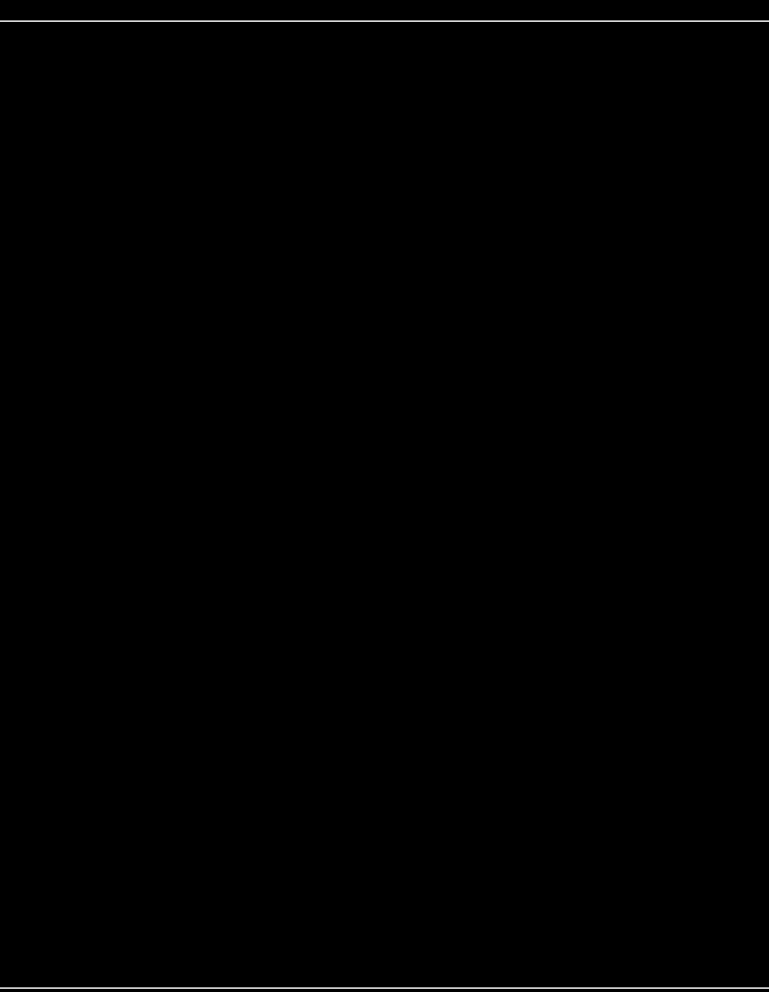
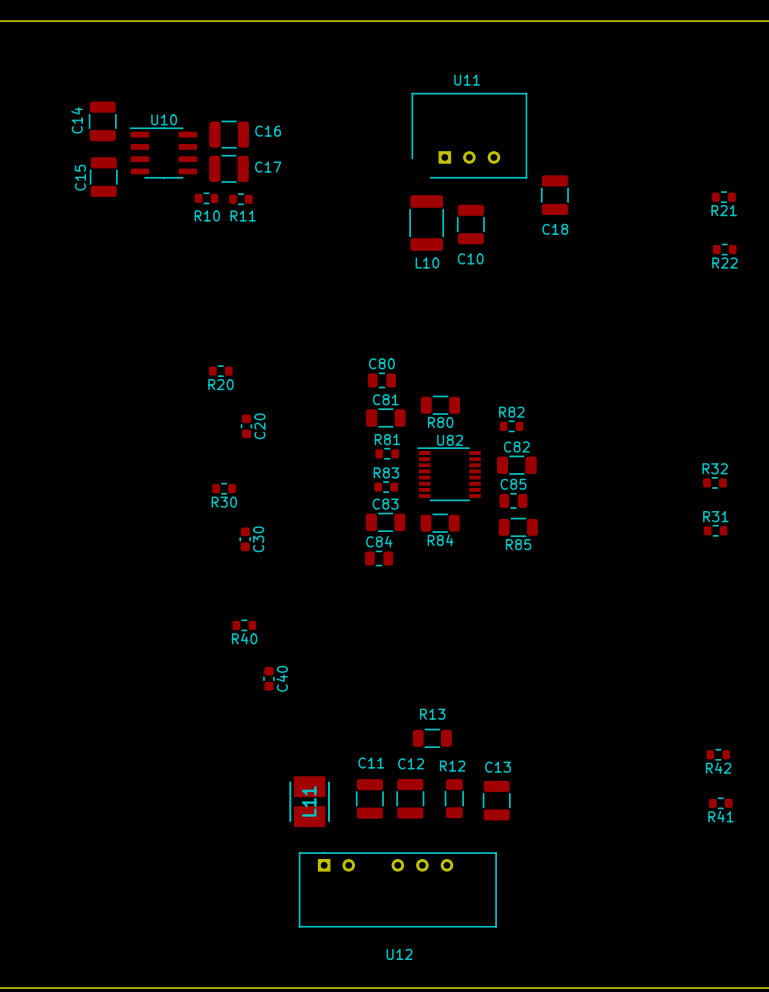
C14: none -> (102, 121)
C16: none -> (229, 134)
U11: none -> (469, 135)
U10: none -> (163, 153)
C17: none -> (228, 168)
C15: none -> (103, 177)
C18: none -> (554, 195)
R21: none -> (723, 197)
R10: none -> (206, 198)
R11: none -> (240, 199)
L10: none -> (426, 223)
C10: none -> (470, 224)
R22: none -> (724, 249)
R20: none -> (220, 371)
C80: none -> (381, 380)
R80: none -> (440, 405)
C81: none -> (385, 418)
C20: none -> (246, 426)
R82: none -> (511, 426)
R81: none -> (387, 453)
C82: none -> (516, 465)
U82: none -> (449, 474)
R32: none -> (714, 482)
R83: none -> (386, 487)
R30: none -> (224, 488)
C85: none -> (513, 500)
C83: none -> (385, 522)
R84: none -> (440, 523)
R85: none -> (518, 527)
R31: none -> (715, 530)
C30: none -> (245, 539)
C84: none -> (379, 558)
R40: none -> (244, 625)
C40: none -> (268, 678)
R13: none -> (432, 738)
R42: none -> (718, 754)
C11: none -> (369, 798)
C12: none -> (410, 798)
R12: none -> (454, 798)
C13: none -> (496, 800)
L11: none -> (309, 801)
R41: none -> (720, 803)
U12: none -> (397, 889)

